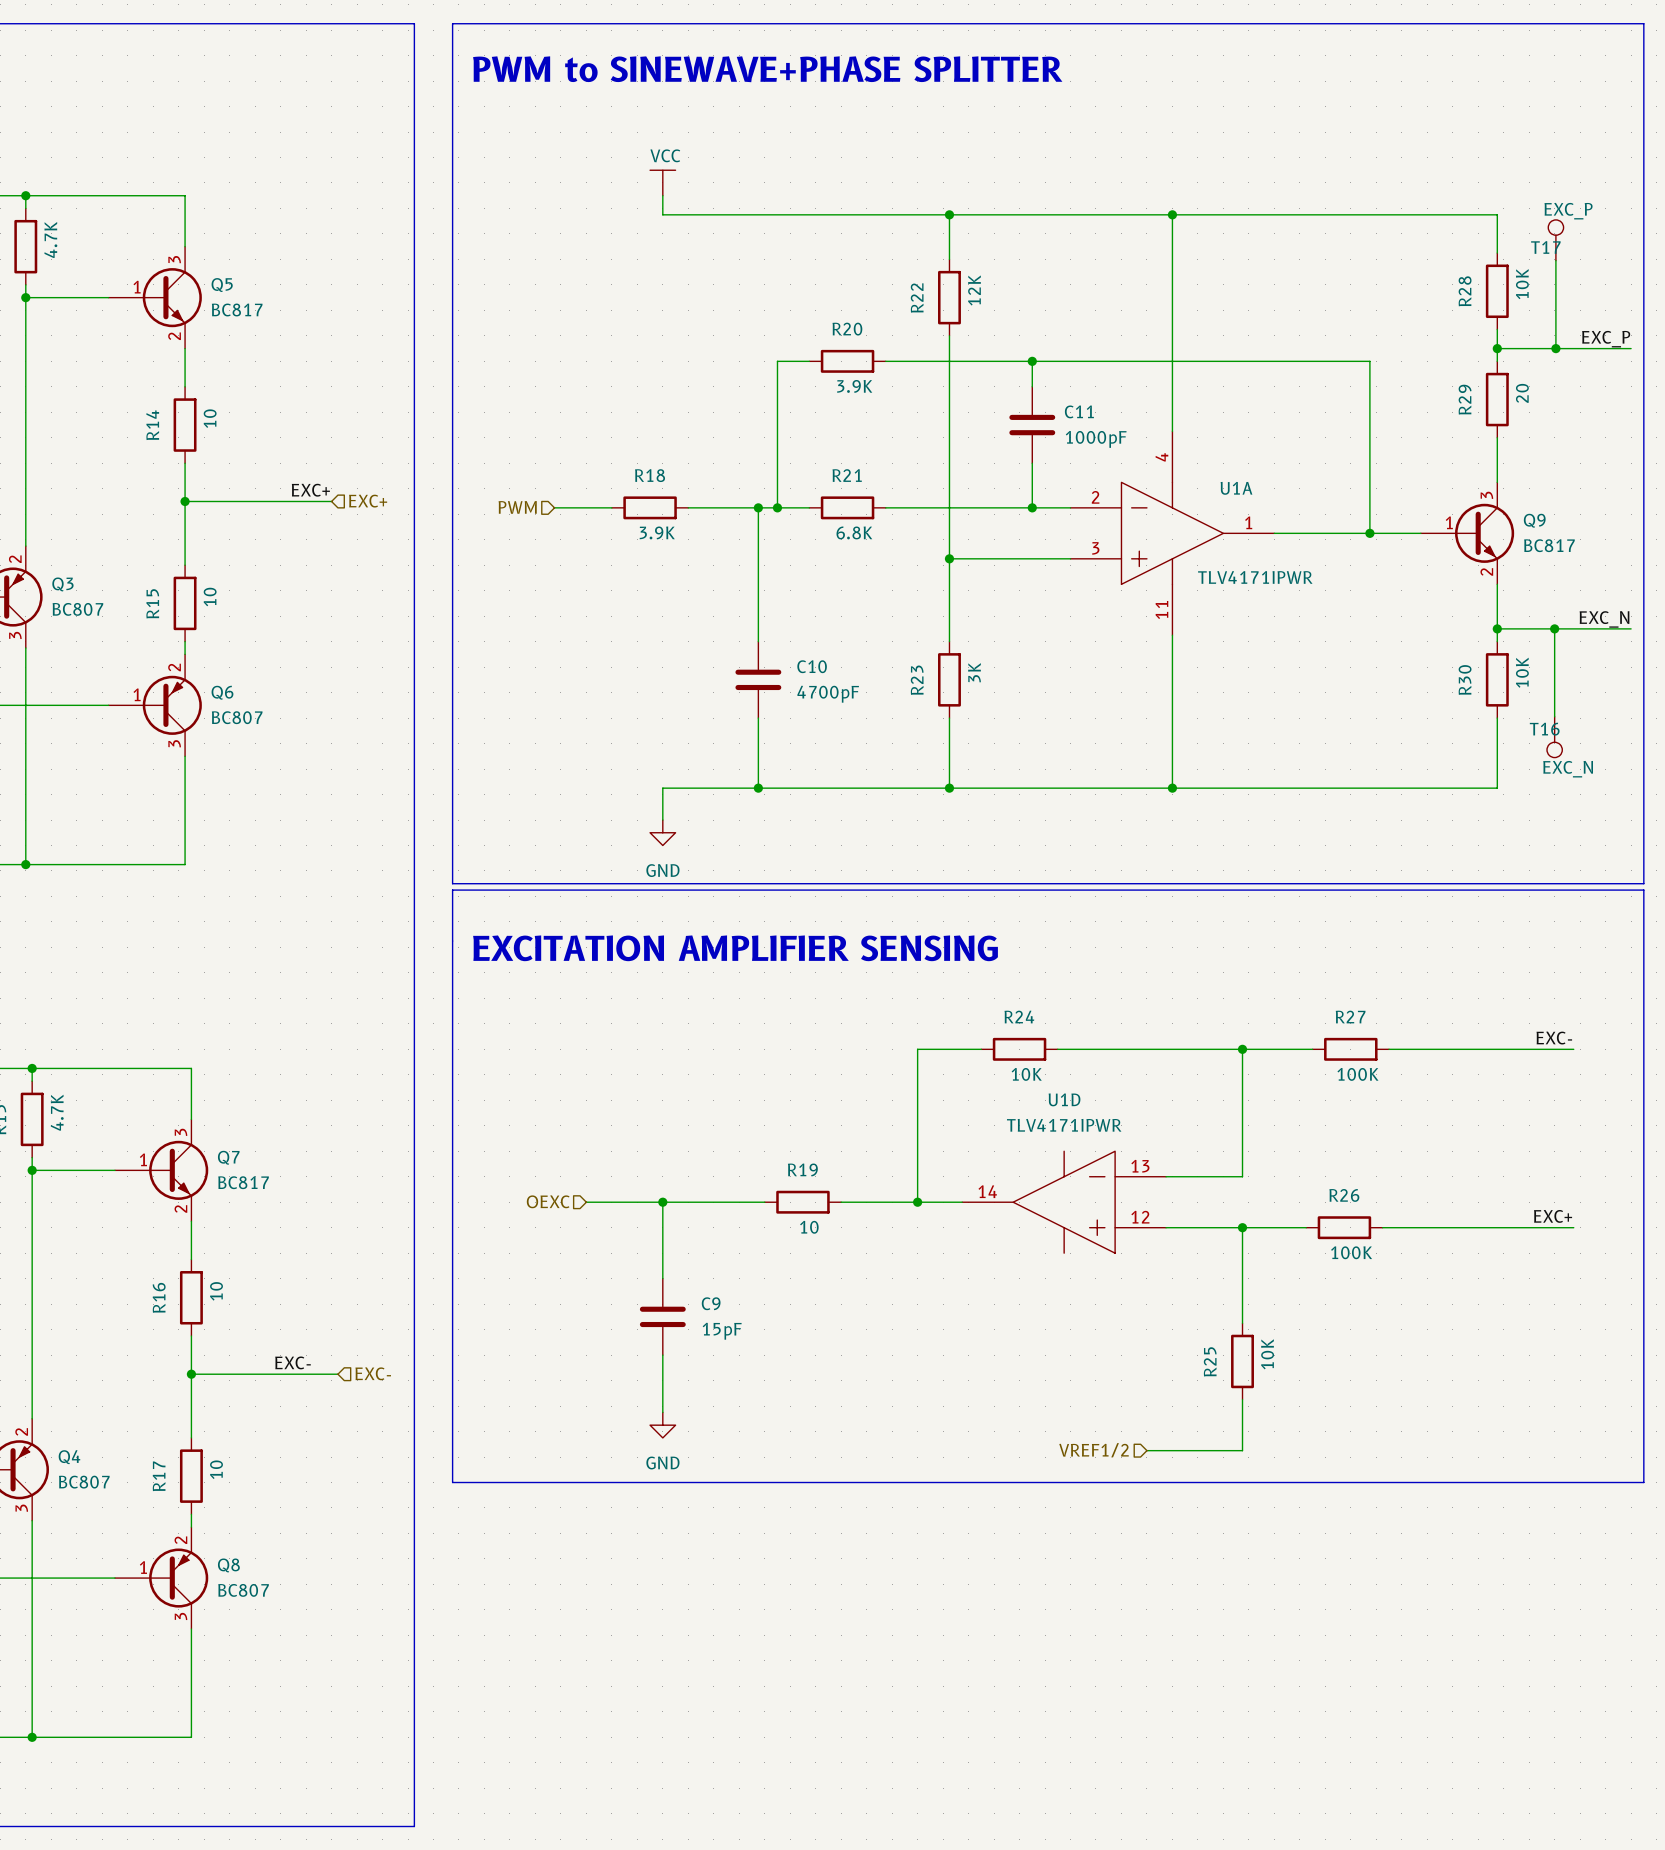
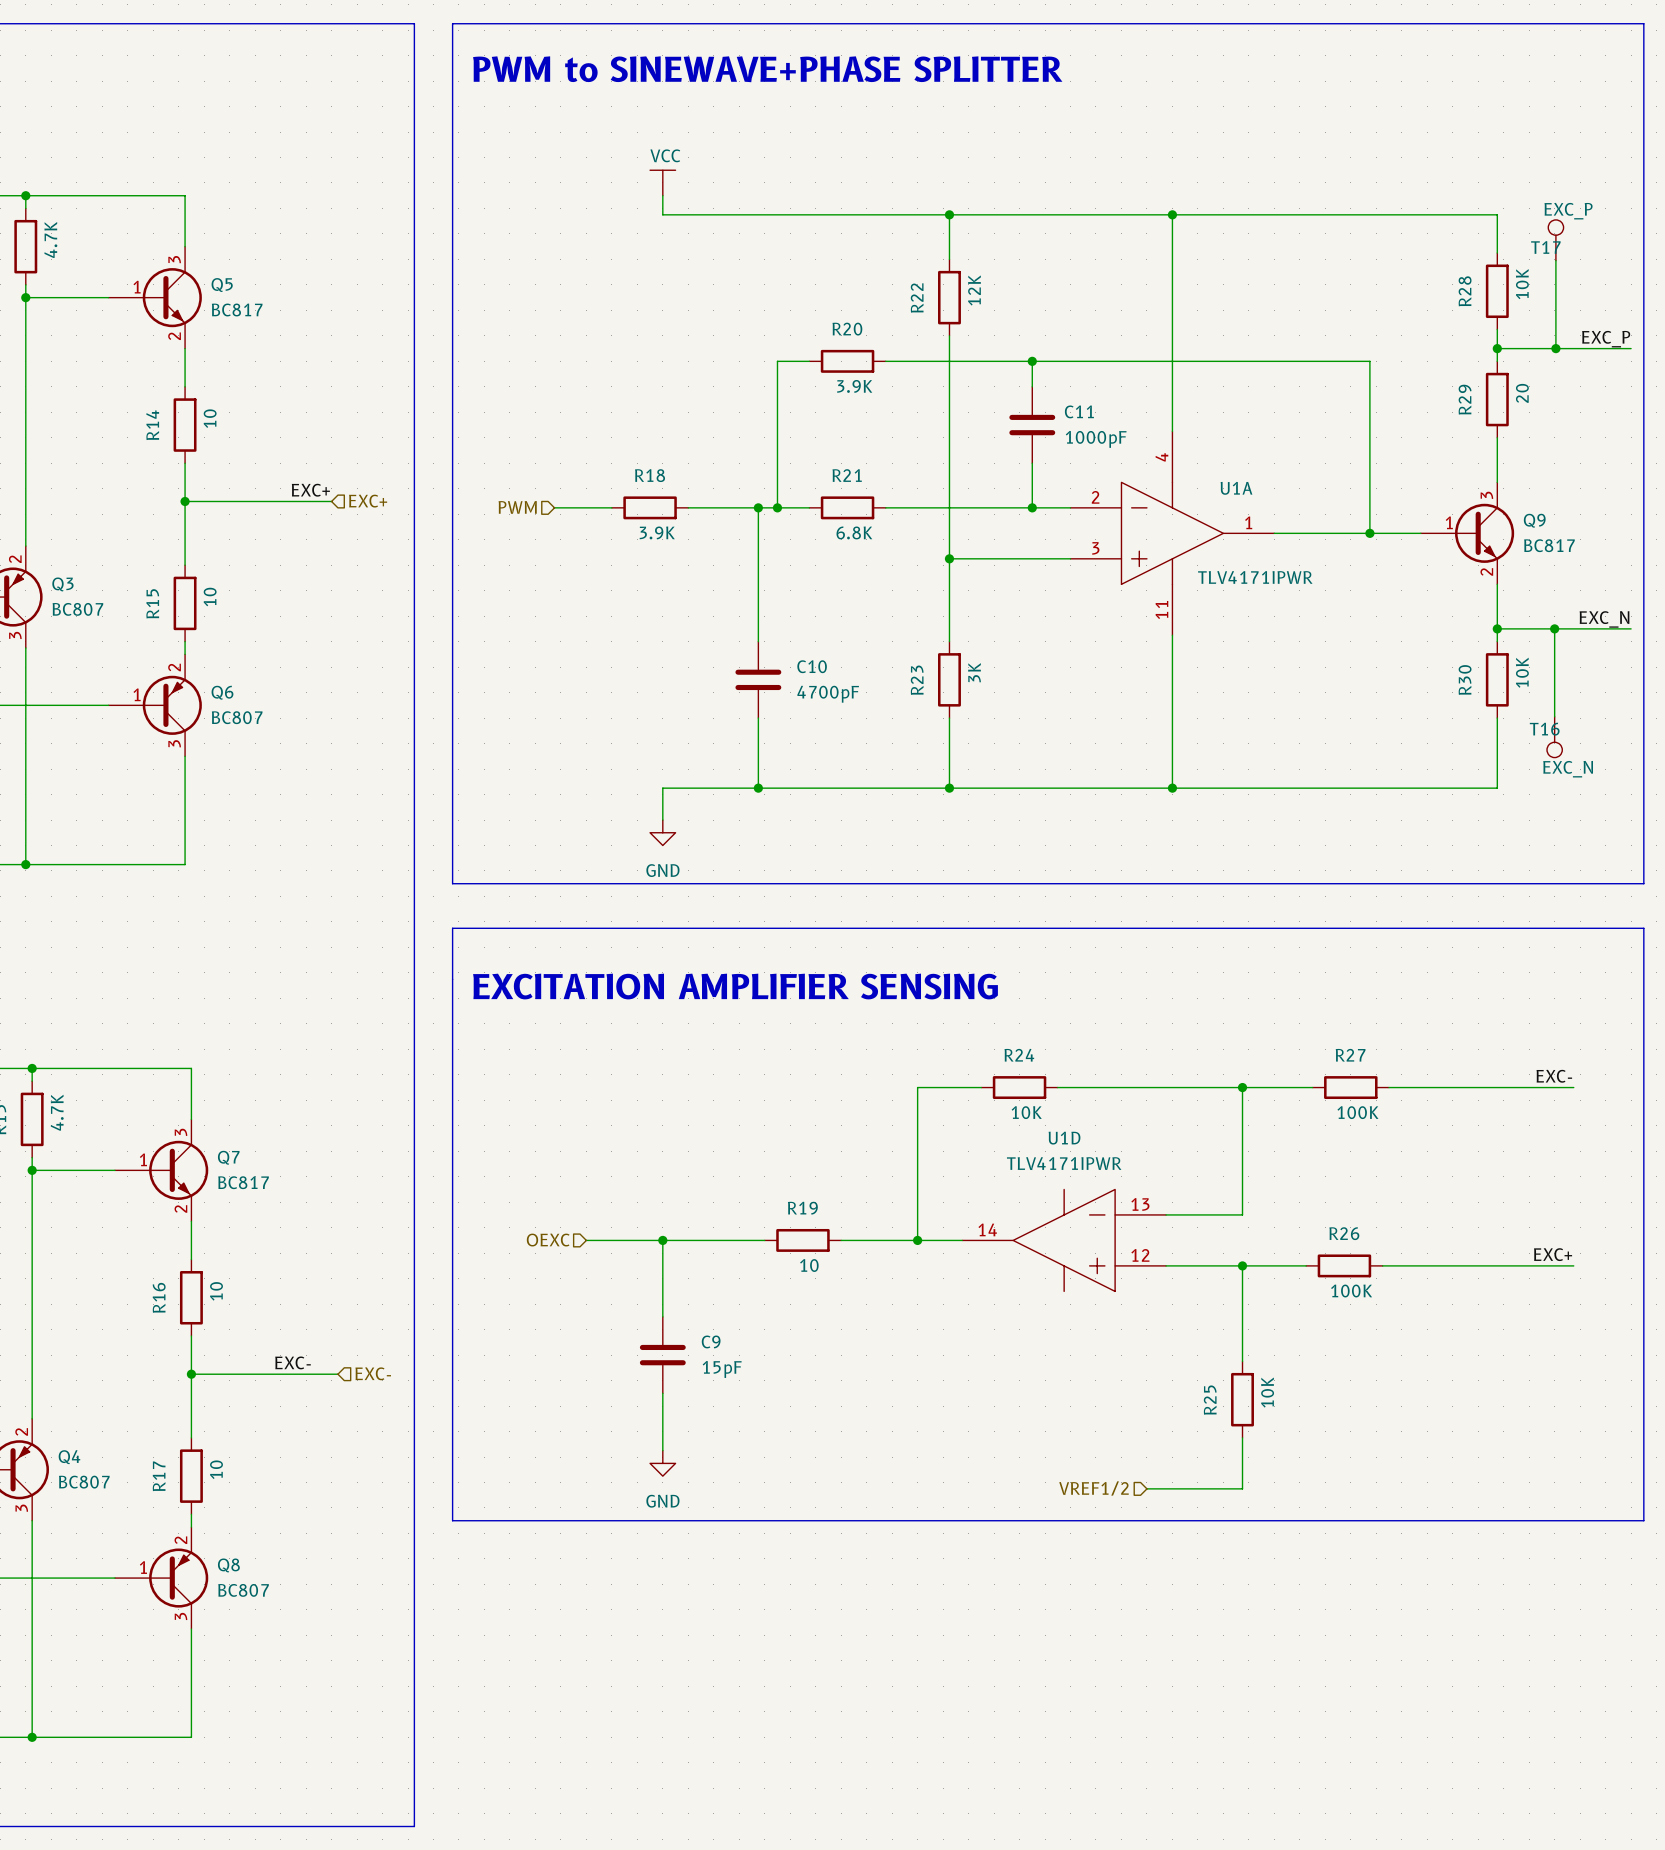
line: (452, 928) (452, 890) (1643, 890) (1643, 928) -> (452, 928) (1643, 928)
text position: EXCITATION AMPLIFIER SENSING (735, 948) -> EXCITATION AMPLIFIER SENSING (735, 986)
label position: EXC- (1554, 1038) -> EXC- (1554, 1076)
wire: (981, 1049) (917, 1049) (917, 1087) -> (981, 1087) (917, 1087)
R24 position: (1019, 1049) -> (1019, 1087)
wire: (1057, 1049) (1312, 1049) -> (1057, 1087) (1312, 1087)
wire: (1242, 1049) (1242, 1087) -> none
junction position: (1242, 1049) -> (1242, 1087)
R27 position: (1350, 1049) -> (1350, 1087)
wire: (1389, 1049) (1573, 1049) -> (1389, 1087) (1573, 1087)
wire: (1166, 1176) (1242, 1176) -> (1166, 1214) (1242, 1214) (1242, 1176)
hierarchical label position: OEXC (548, 1201) -> OEXC (548, 1240)
wire: (586, 1202) (764, 1202) -> (586, 1240) (764, 1240)
wire: (662, 1202) (662, 1240) -> (662, 1412) (662, 1450)
junction position: (662, 1202) -> (662, 1240)
R19 position: (802, 1202) -> (802, 1240)
wire: (841, 1202) (962, 1202) -> (841, 1240) (962, 1240)
wire: none -> (917, 1202) (917, 1240)
junction position: (917, 1202) -> (917, 1240)
U1D position: (1064, 1202) -> (1064, 1240)
label position: EXC+ (1553, 1216) -> EXC+ (1553, 1254)
wire: (1166, 1227) (1306, 1227) -> (1166, 1265) (1306, 1265)
wire: (1242, 1227) (1242, 1265) -> none
junction position: (1242, 1227) -> (1242, 1265)
R26 position: (1344, 1227) -> (1344, 1265)
wire: (1382, 1227) (1573, 1227) -> (1382, 1265) (1573, 1265)
C9 position: (662, 1316) -> (662, 1355)
R25 position: (1242, 1361) -> (1242, 1399)
wire: (1242, 1399) (1242, 1437) -> (1242, 1323) (1242, 1361)
power symbol position: GND (662, 1425) -> GND (662, 1463)
hierarchical label position: VREF1/2 (1093, 1450) -> VREF1/2 (1093, 1488)
wire: (1146, 1450) (1242, 1450) -> (1146, 1488) (1242, 1488) (1242, 1450)
line: (452, 1482) (1643, 1482) -> (452, 1482) (452, 1520) (1643, 1520) (1643, 1482)

